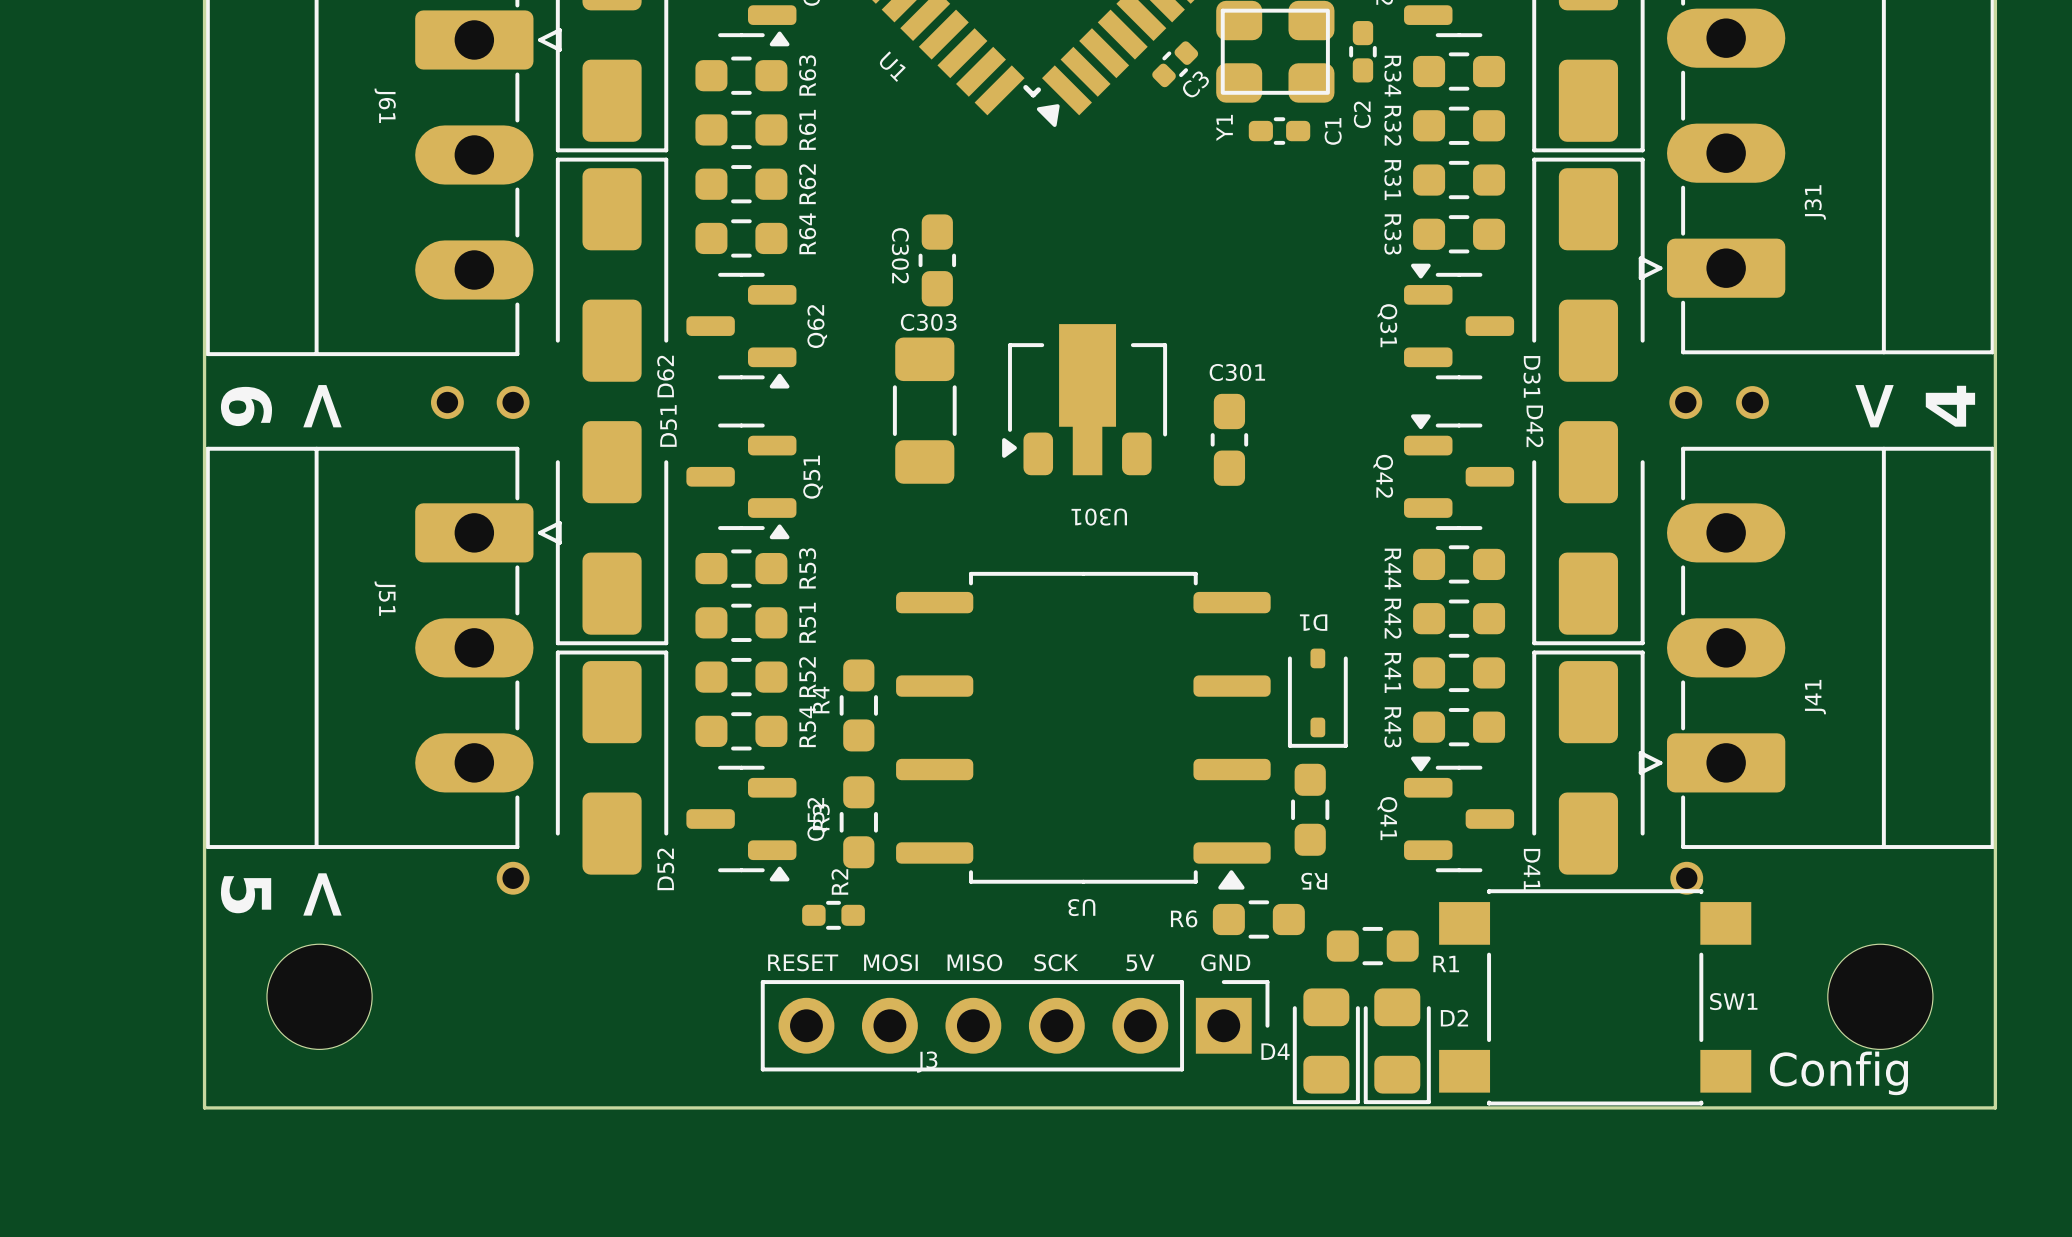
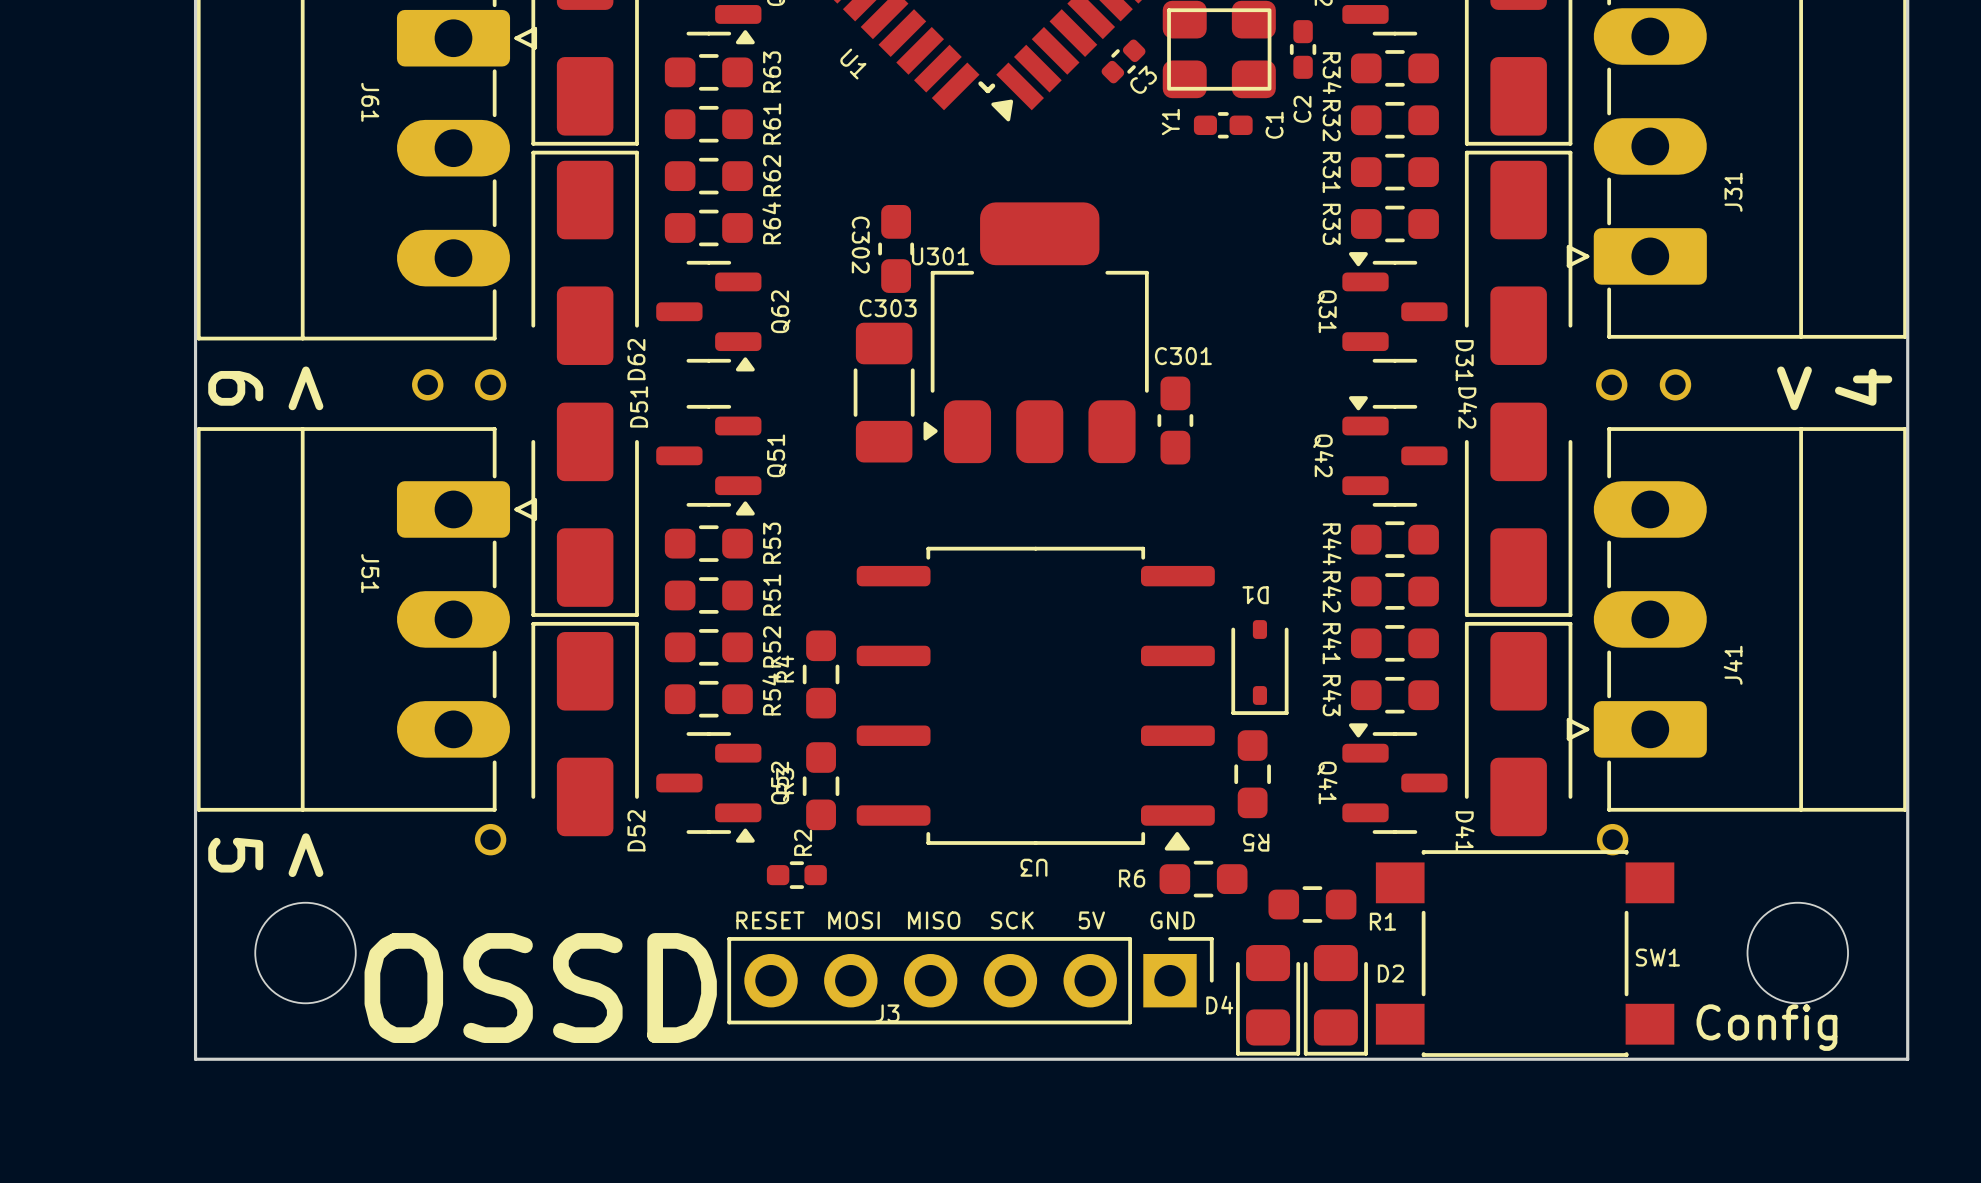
U301 footprint: [1002, 324, 1168, 476] -> [923, 202, 1149, 464]
U301 name position: U301 (1099, 517) -> U301 (940, 256)
text: none -> OSSD (540, 988)

